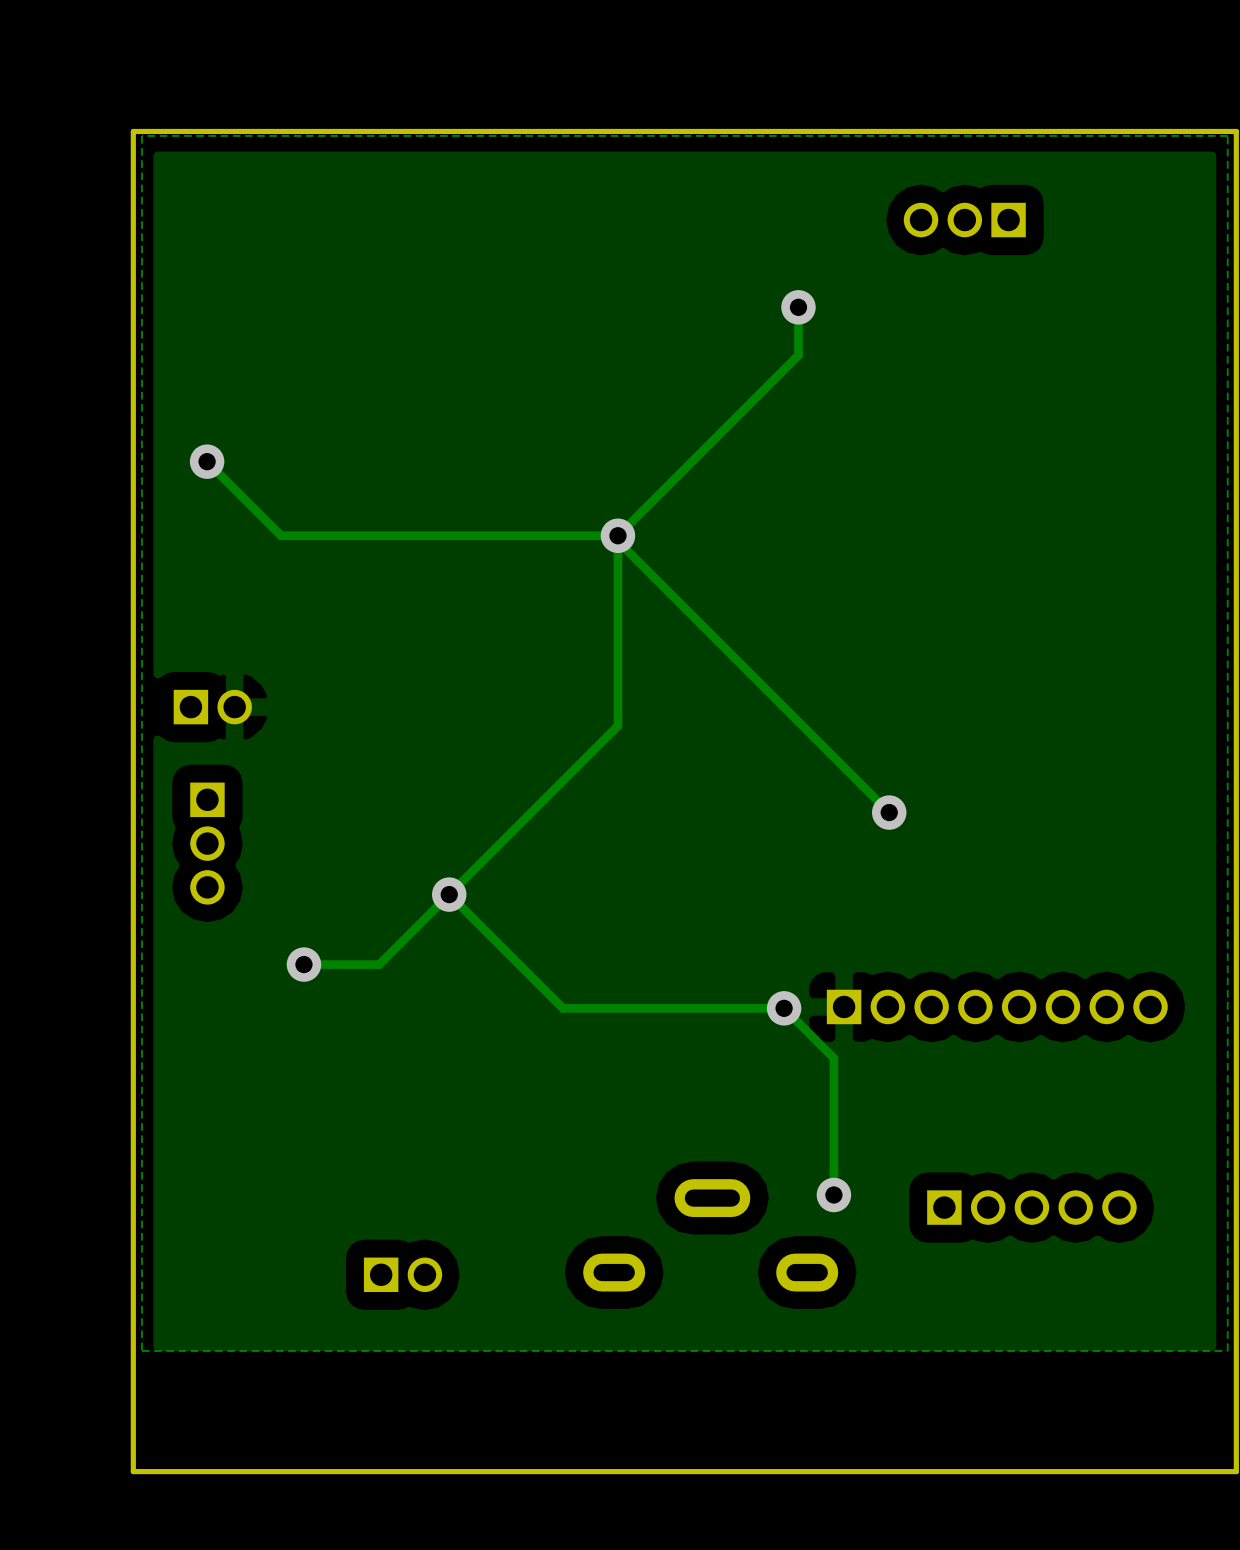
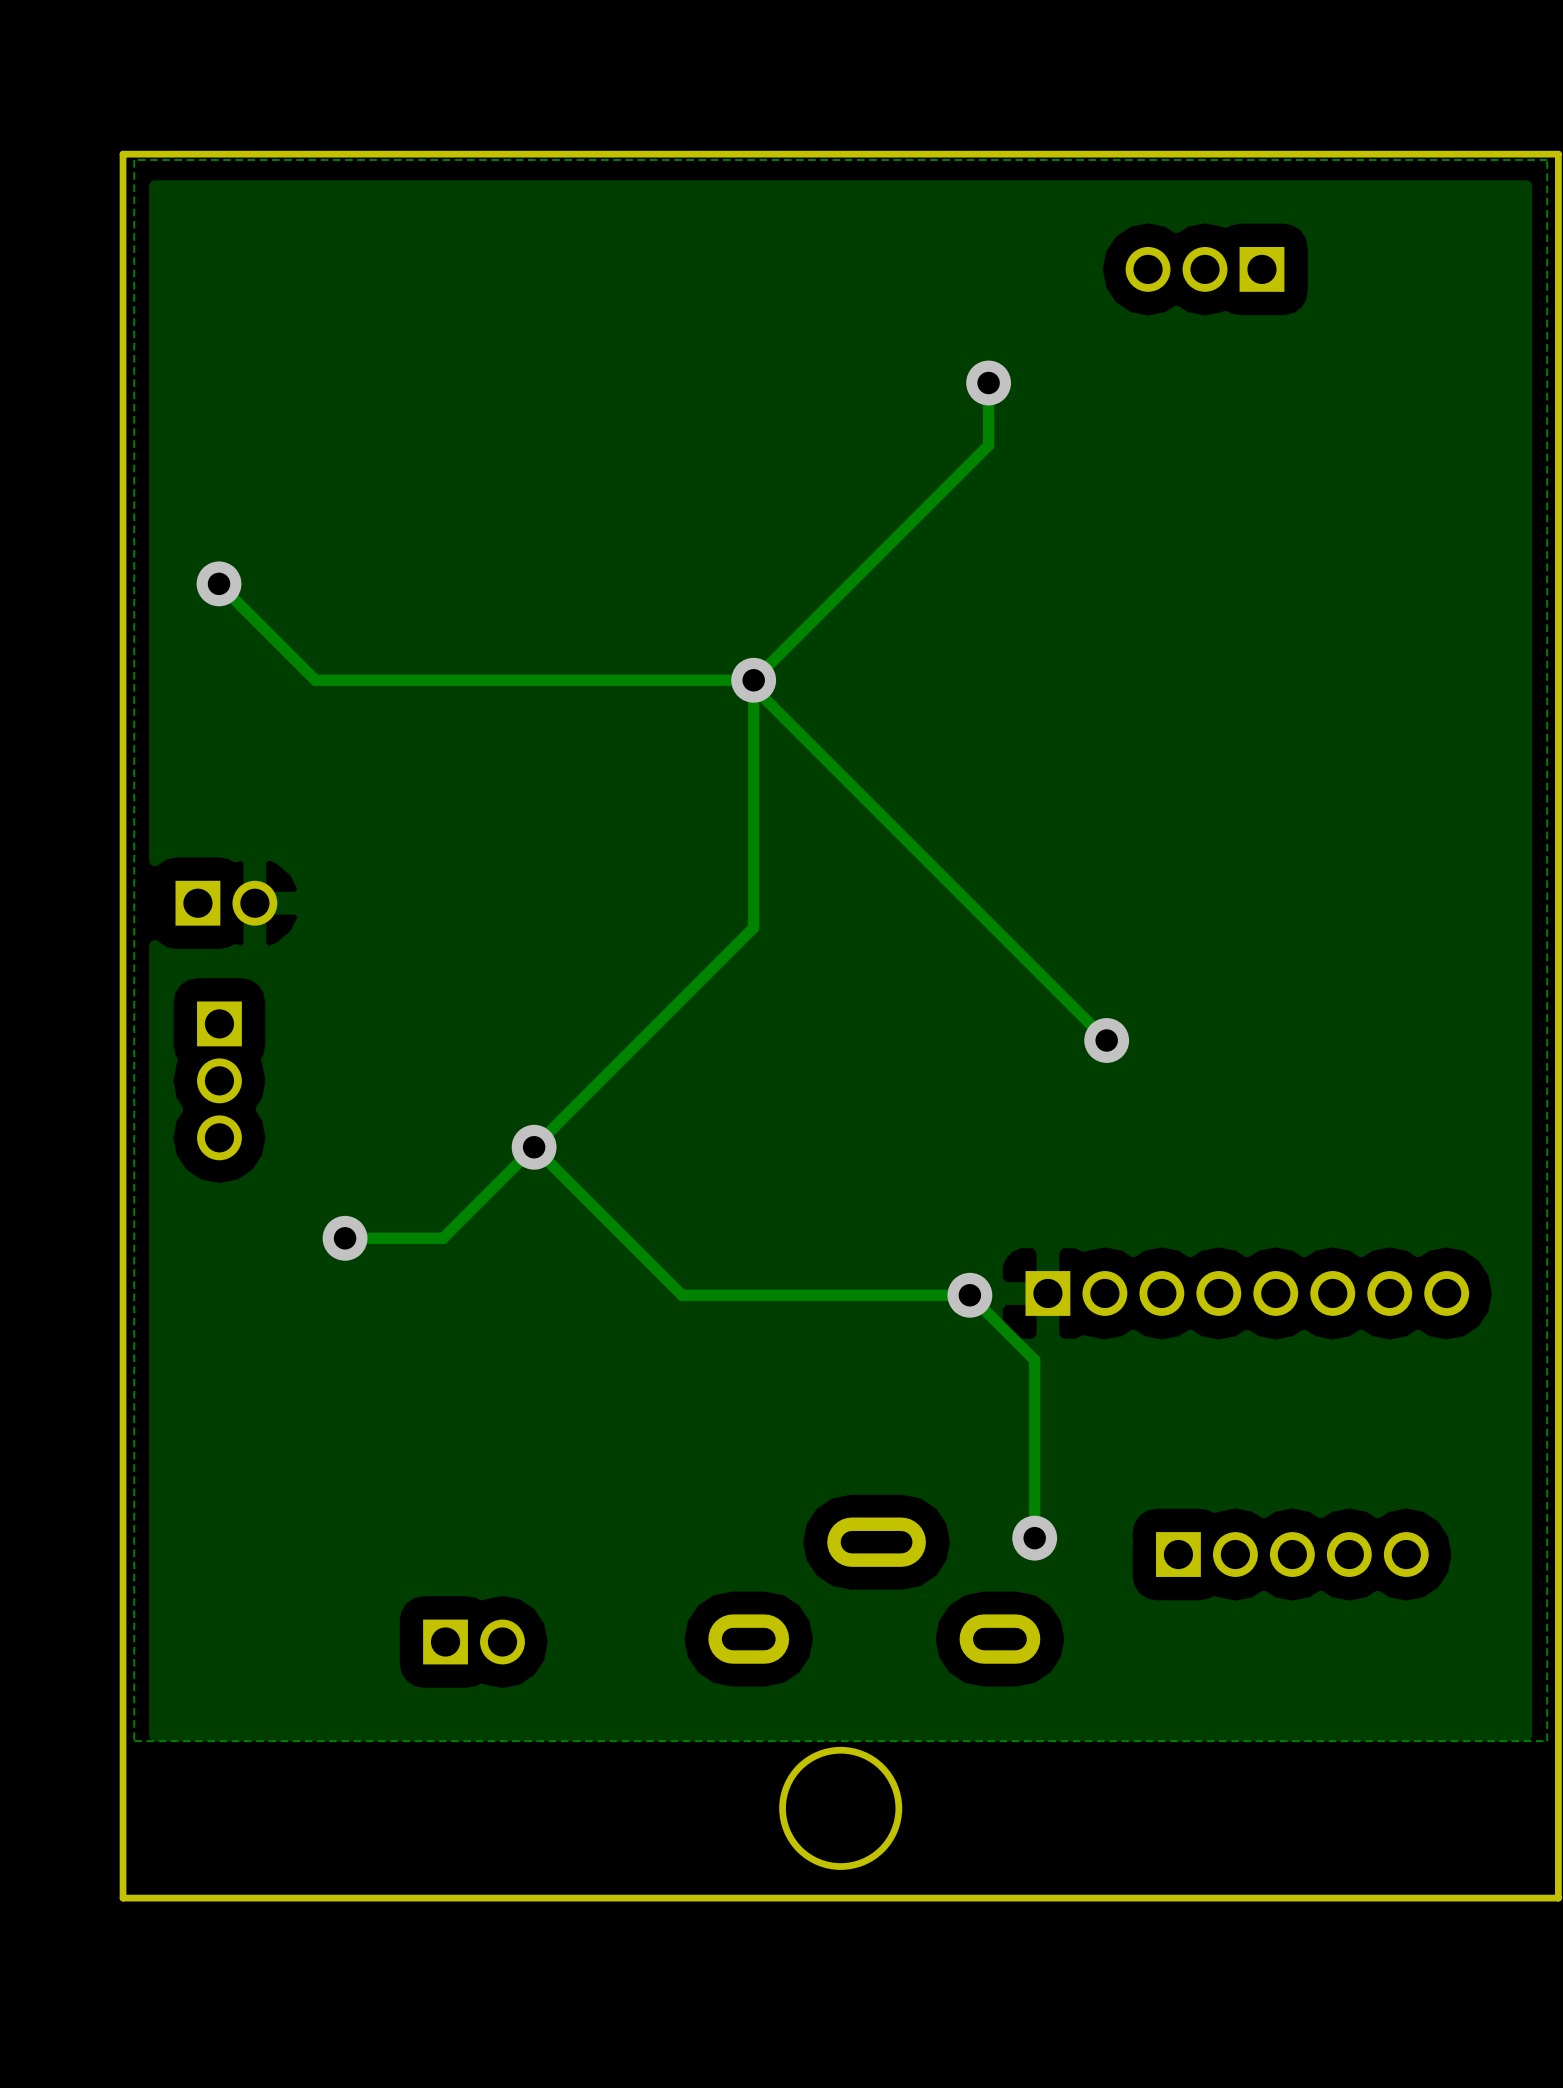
round board edge: none -> [779, 1746, 903, 1870]

